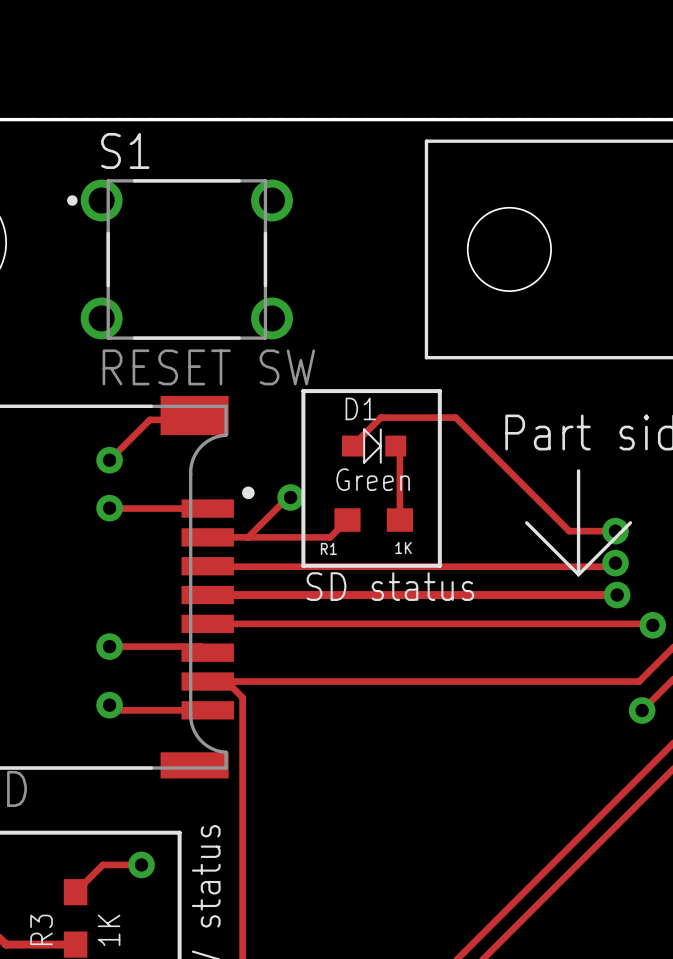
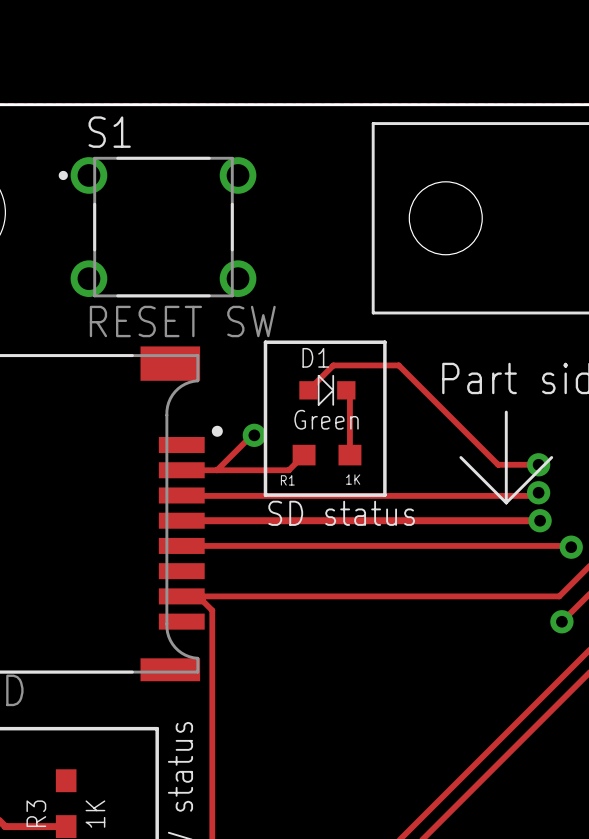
track: (194, 415) (166, 415) (162, 419) (149, 419) (109, 460) -> none
via: (109, 460) -> none
track: (109, 508) (207, 508) -> none
via: (109, 508) -> none
track: (109, 646) (201, 646) (207, 652) -> none
via: (109, 646) -> none
track: (109, 705) (114, 710) (207, 710) -> none
via: (109, 705) -> none
track: (141, 864) (102, 864) (75, 892) -> none
via: (141, 864) -> none

